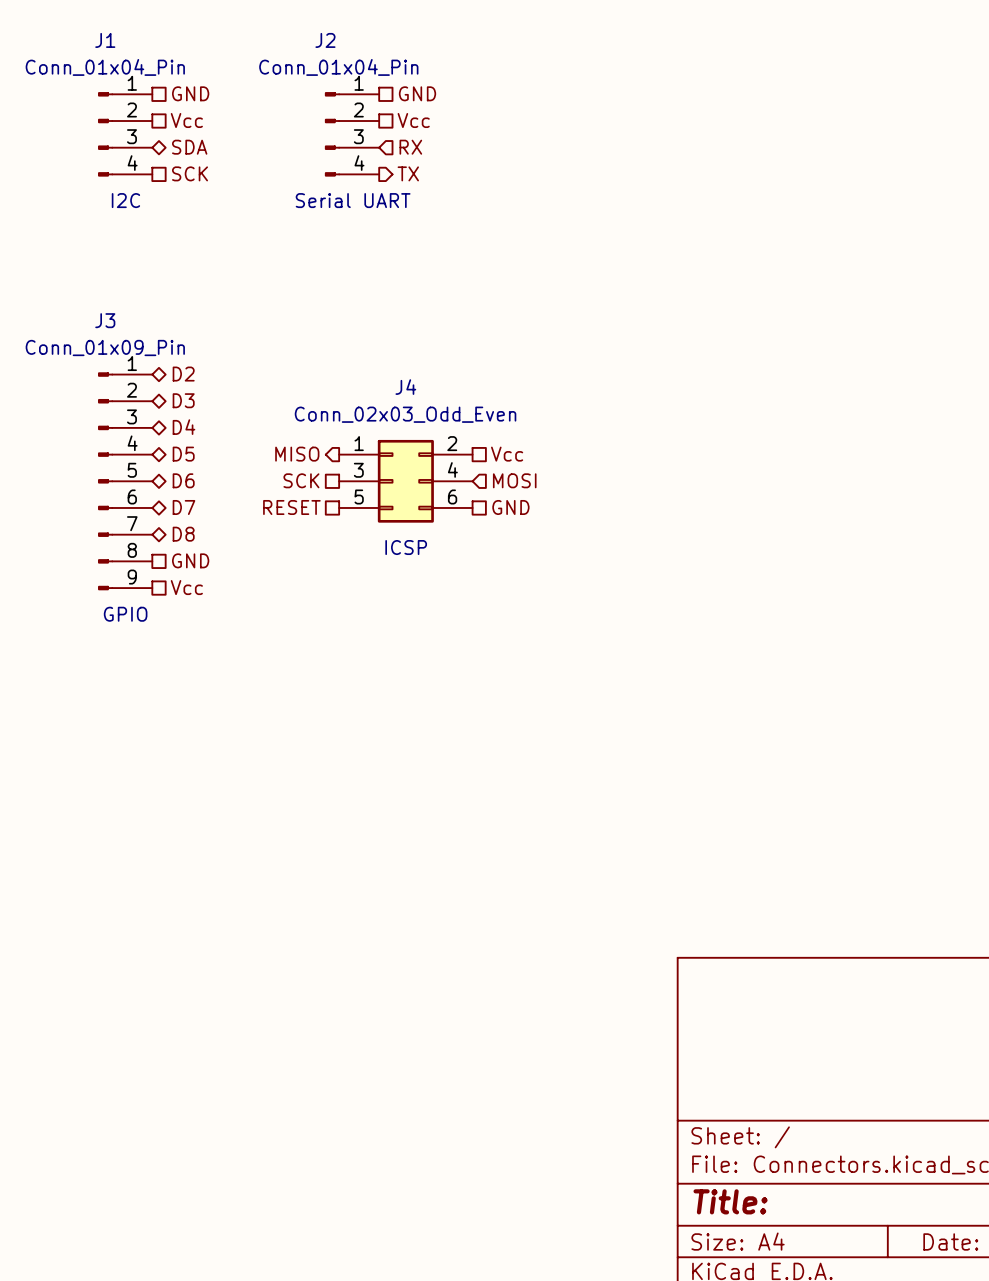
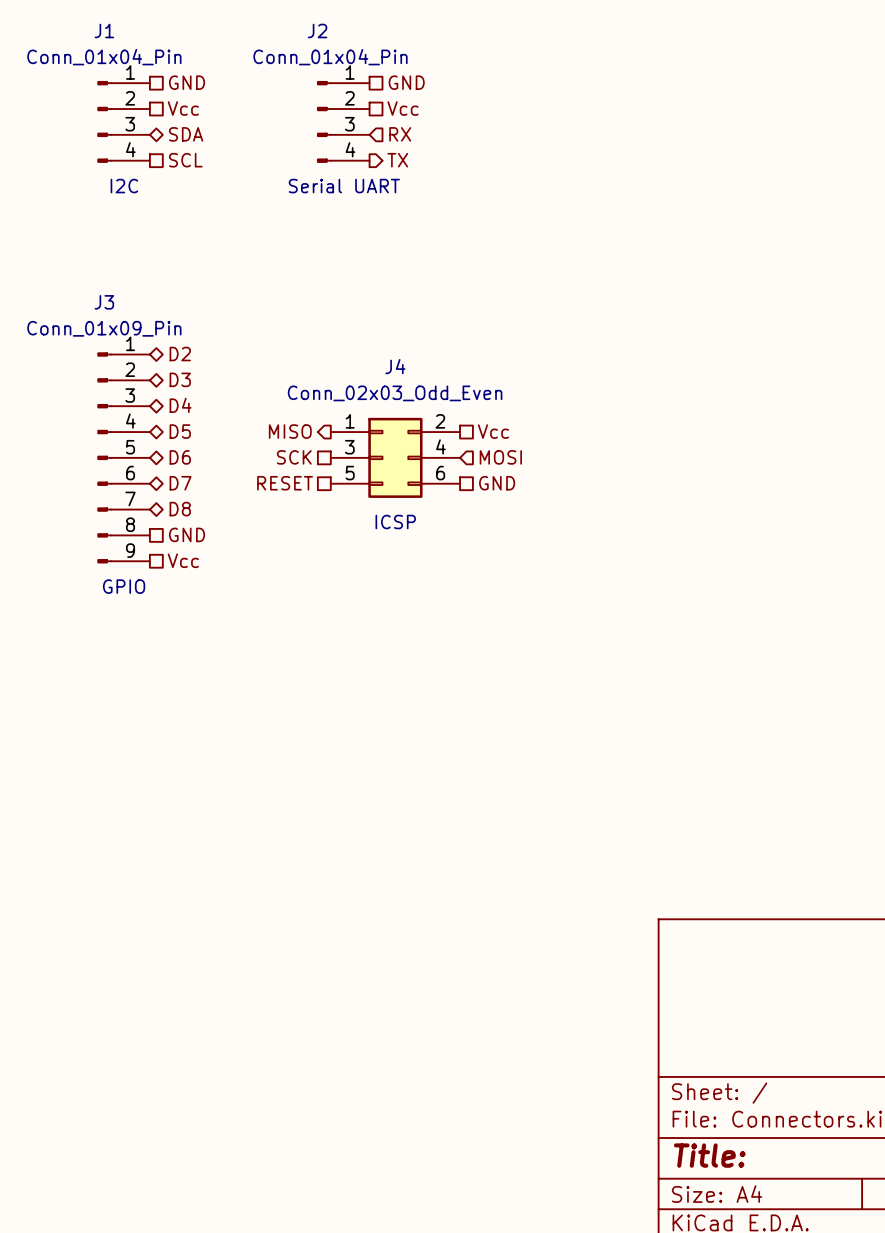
hierarchical label: SCK (190, 173) -> SCL (185, 160)

